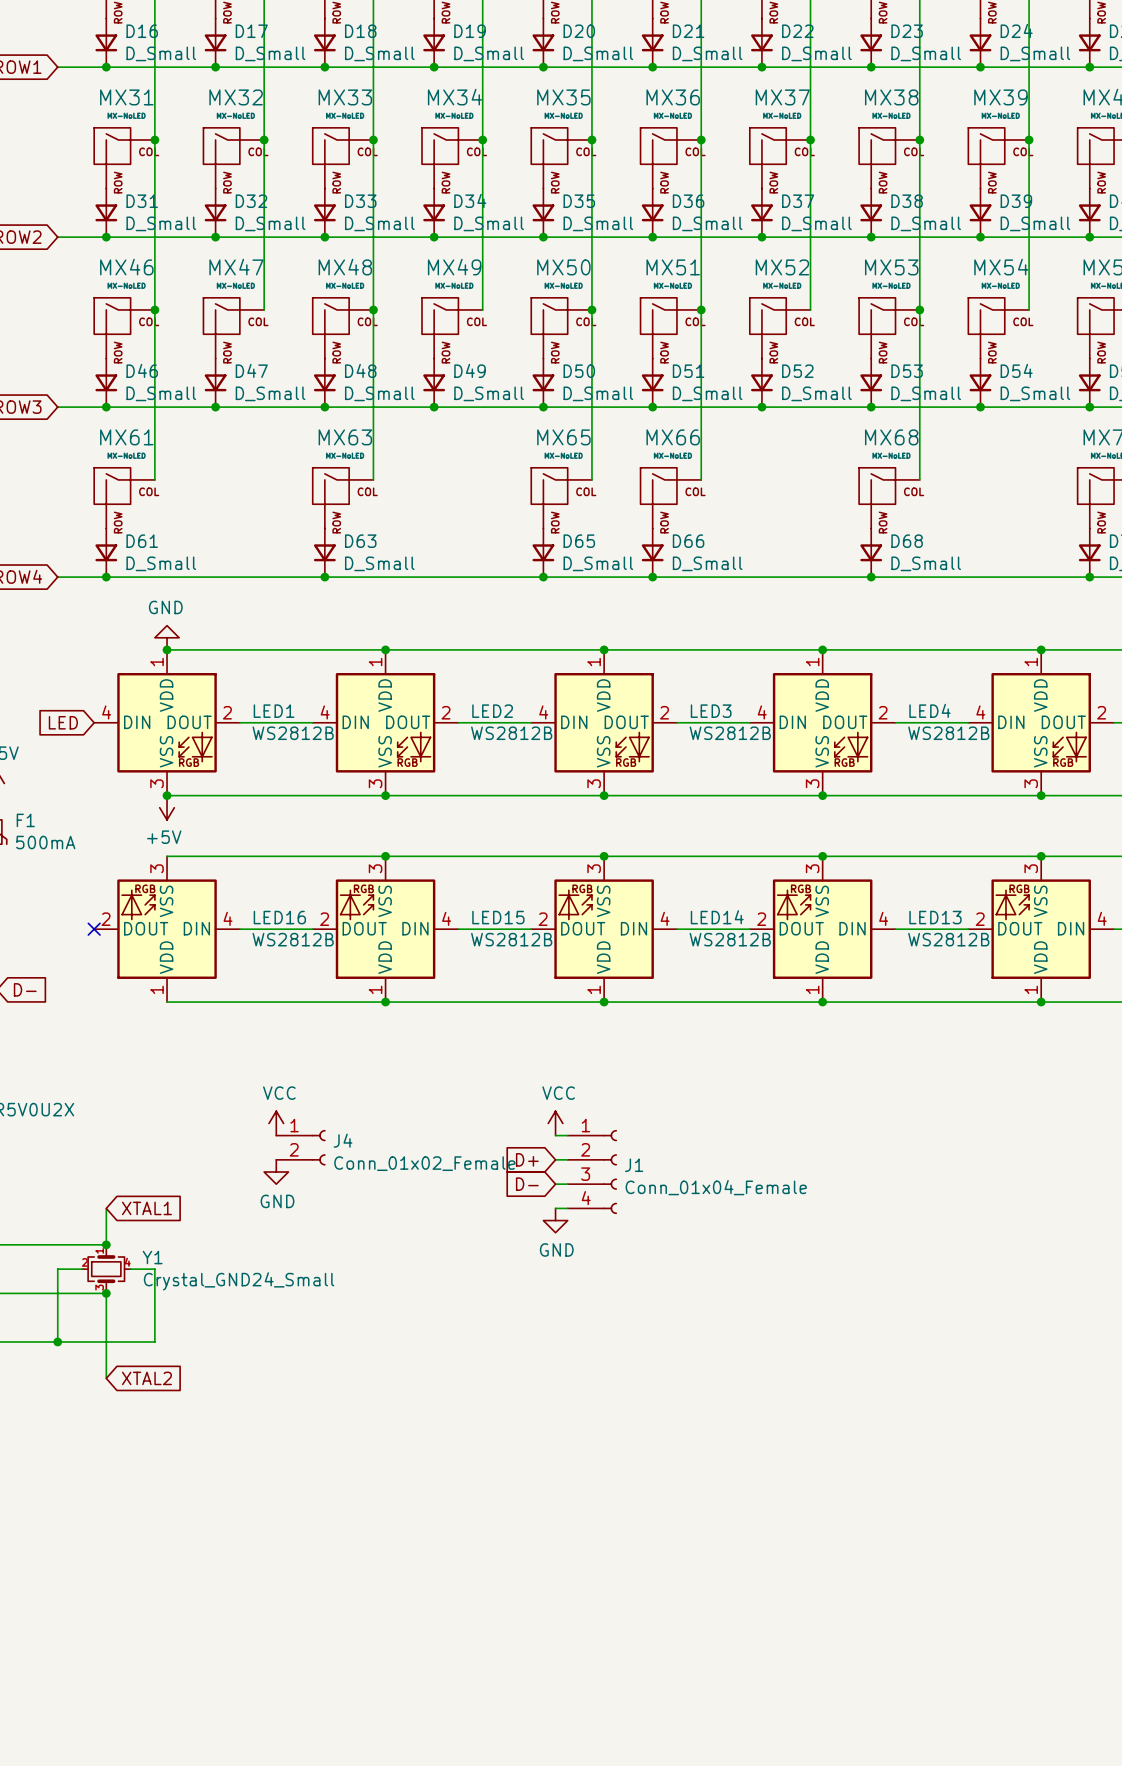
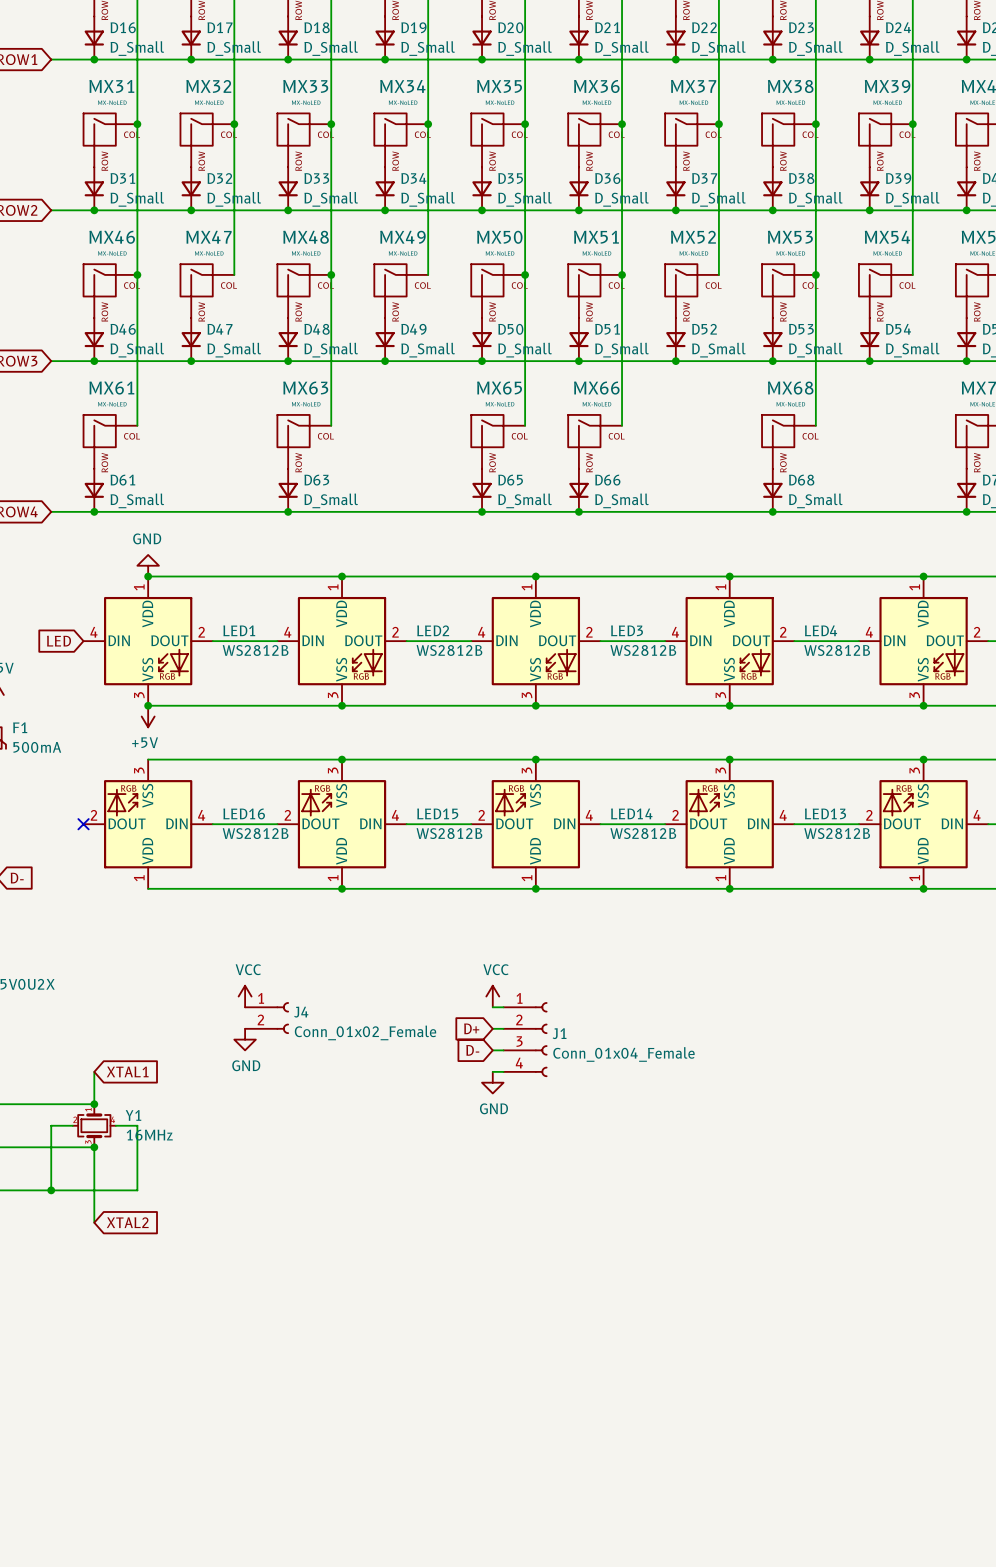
Y1 value: Crystal_GND24_Small (239, 1281) -> 16MHz (149, 1135)

